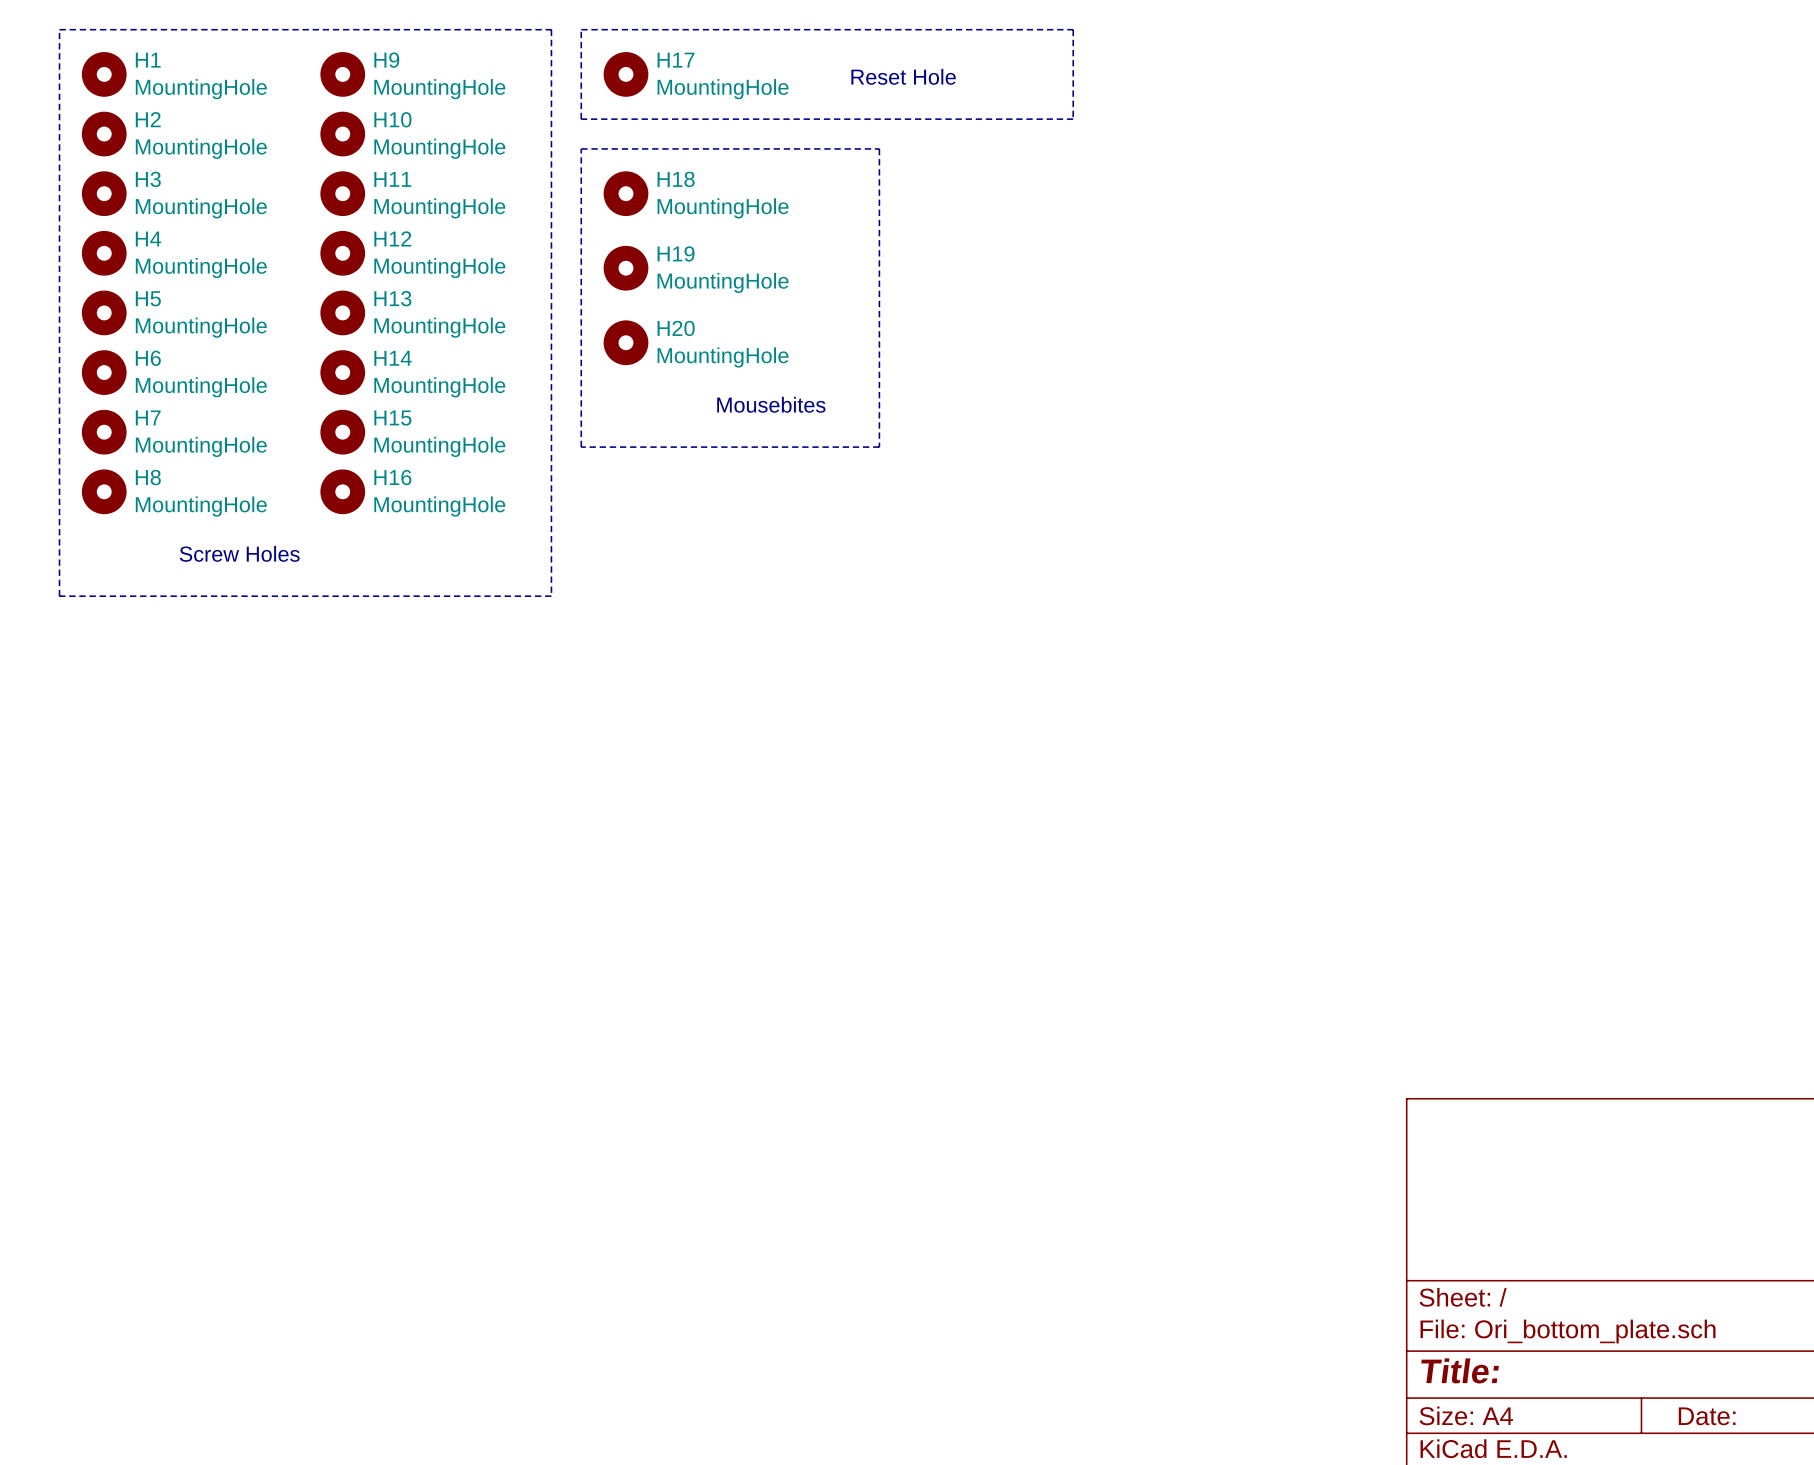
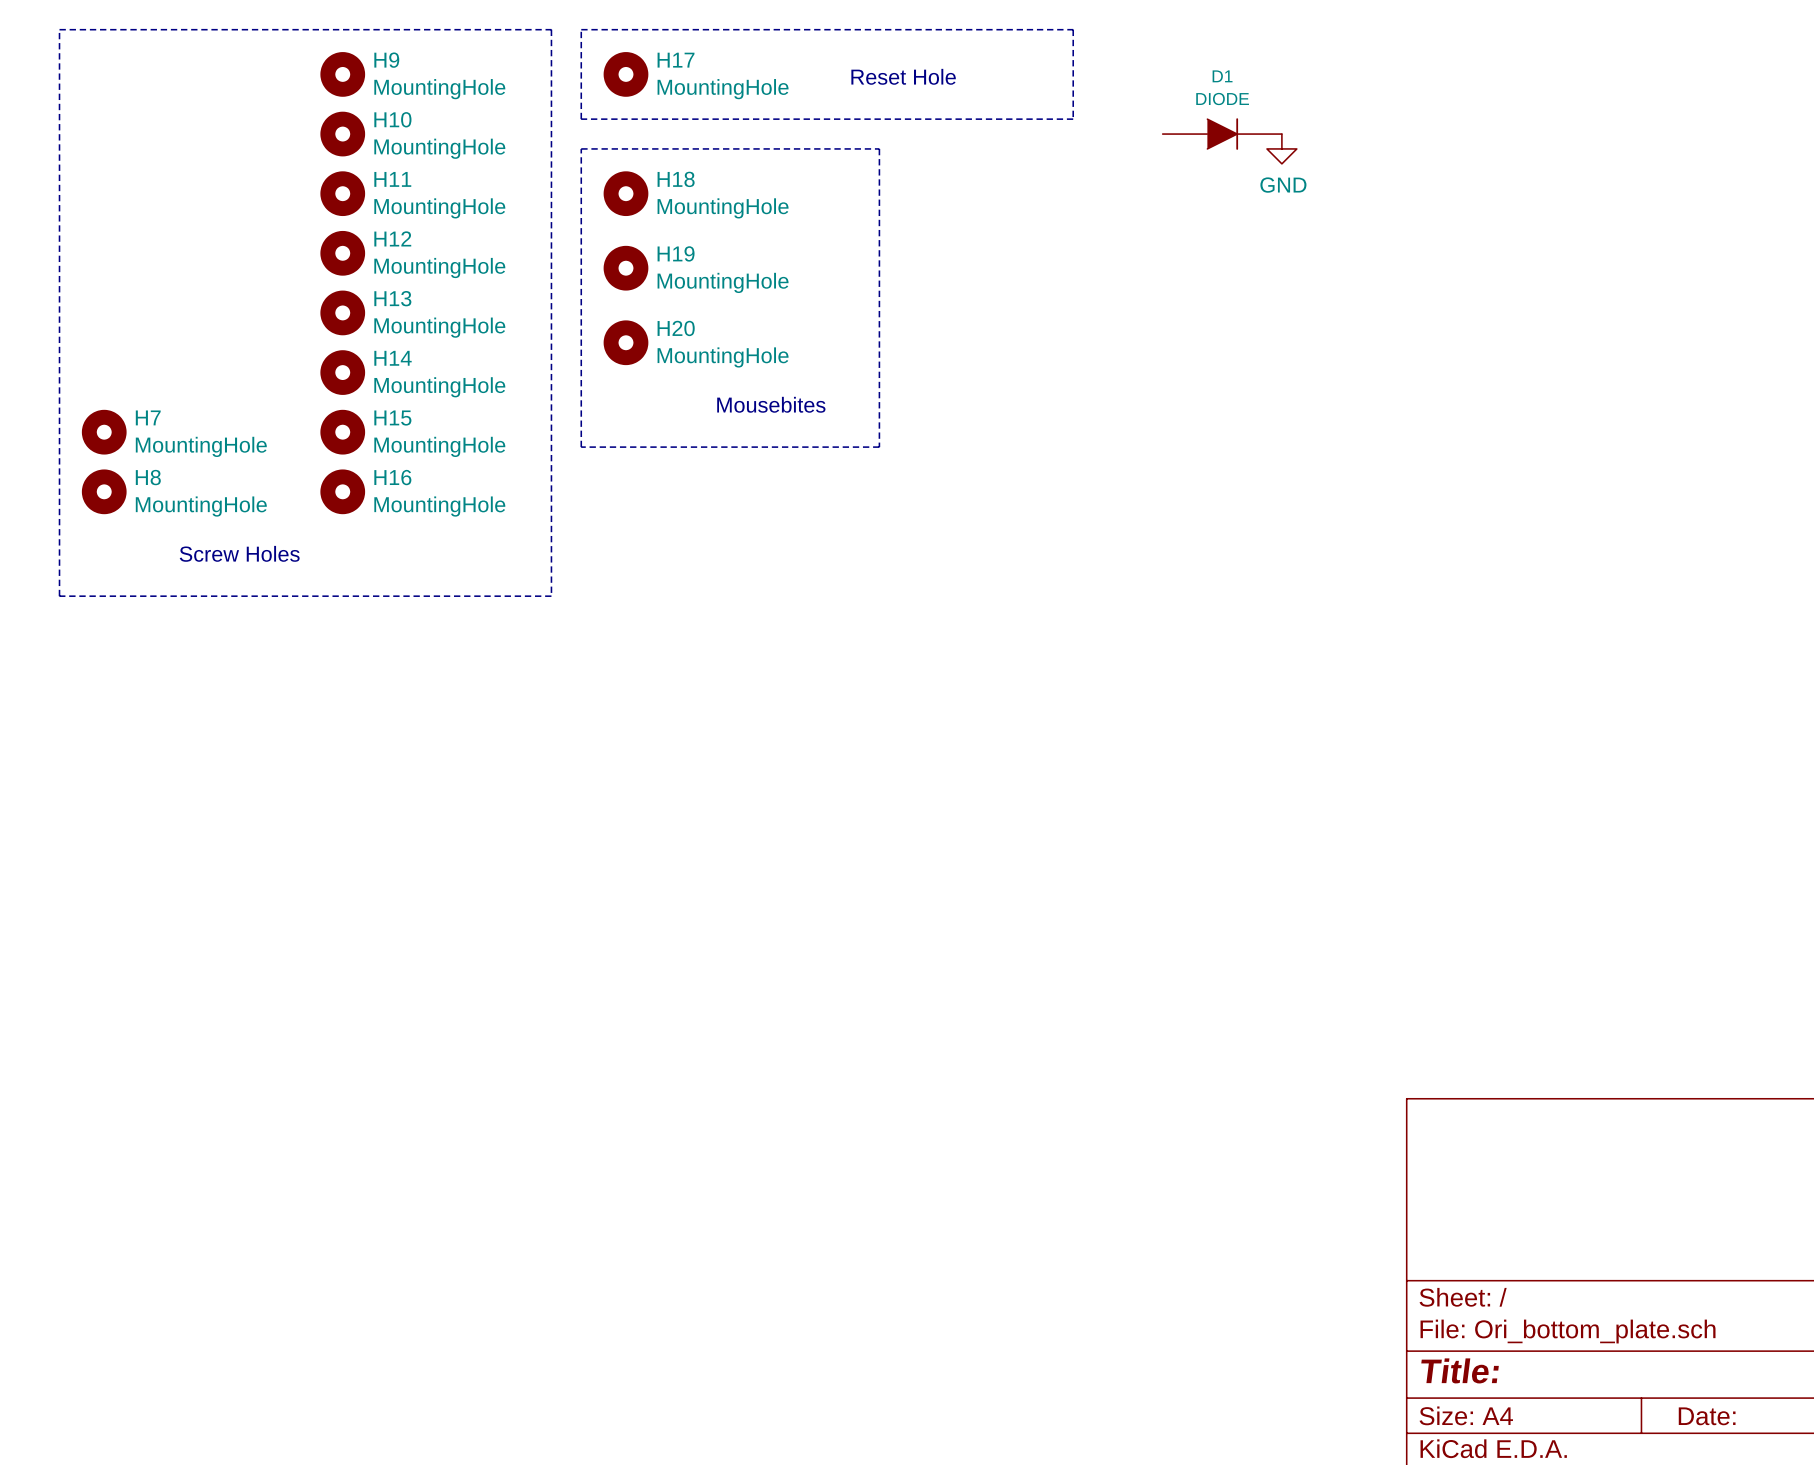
H1: MountingHole (104, 74) -> none
H2: MountingHole (104, 134) -> none
D1: none -> DIODE (1222, 134)
power symbol: none -> GND (1281, 148)
H3: MountingHole (104, 193) -> none
H4: MountingHole (104, 253) -> none
H5: MountingHole (104, 312) -> none
H6: MountingHole (104, 372) -> none

